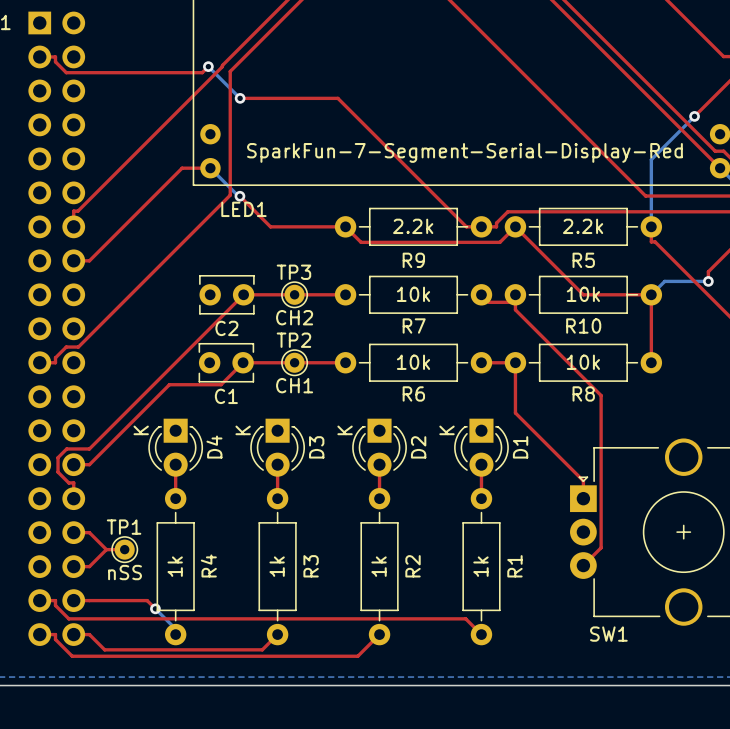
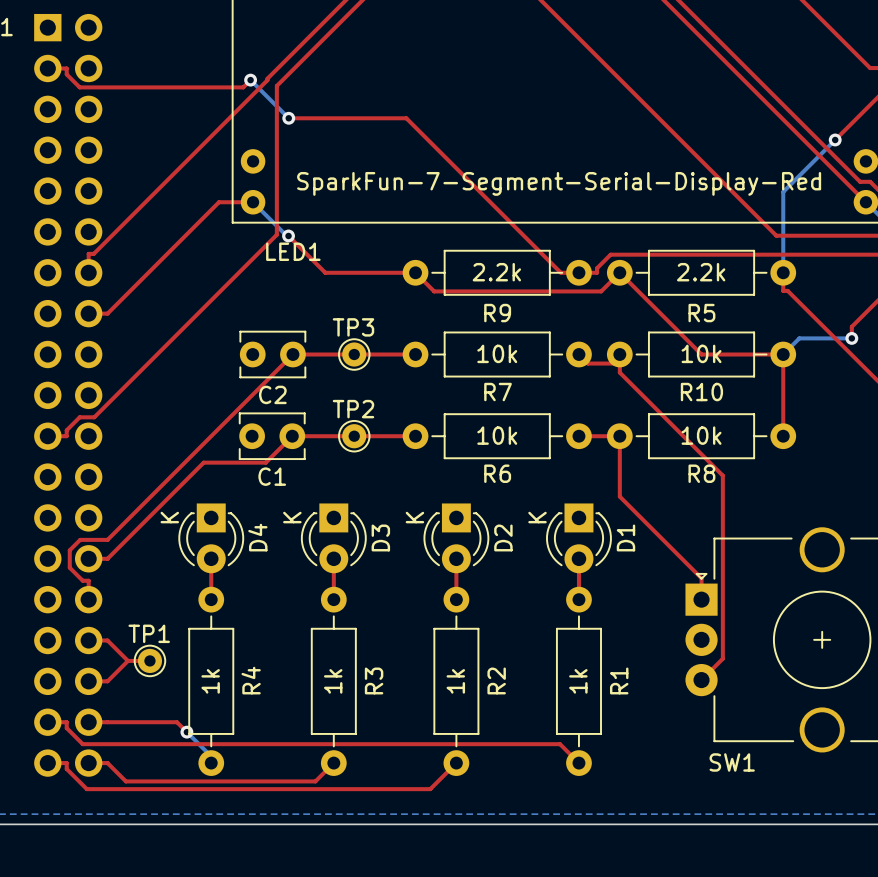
TP3 value: CH2 (294, 317) -> none
TP2 value: CH1 (294, 385) -> none
TP1 value: nSS (125, 572) -> none

